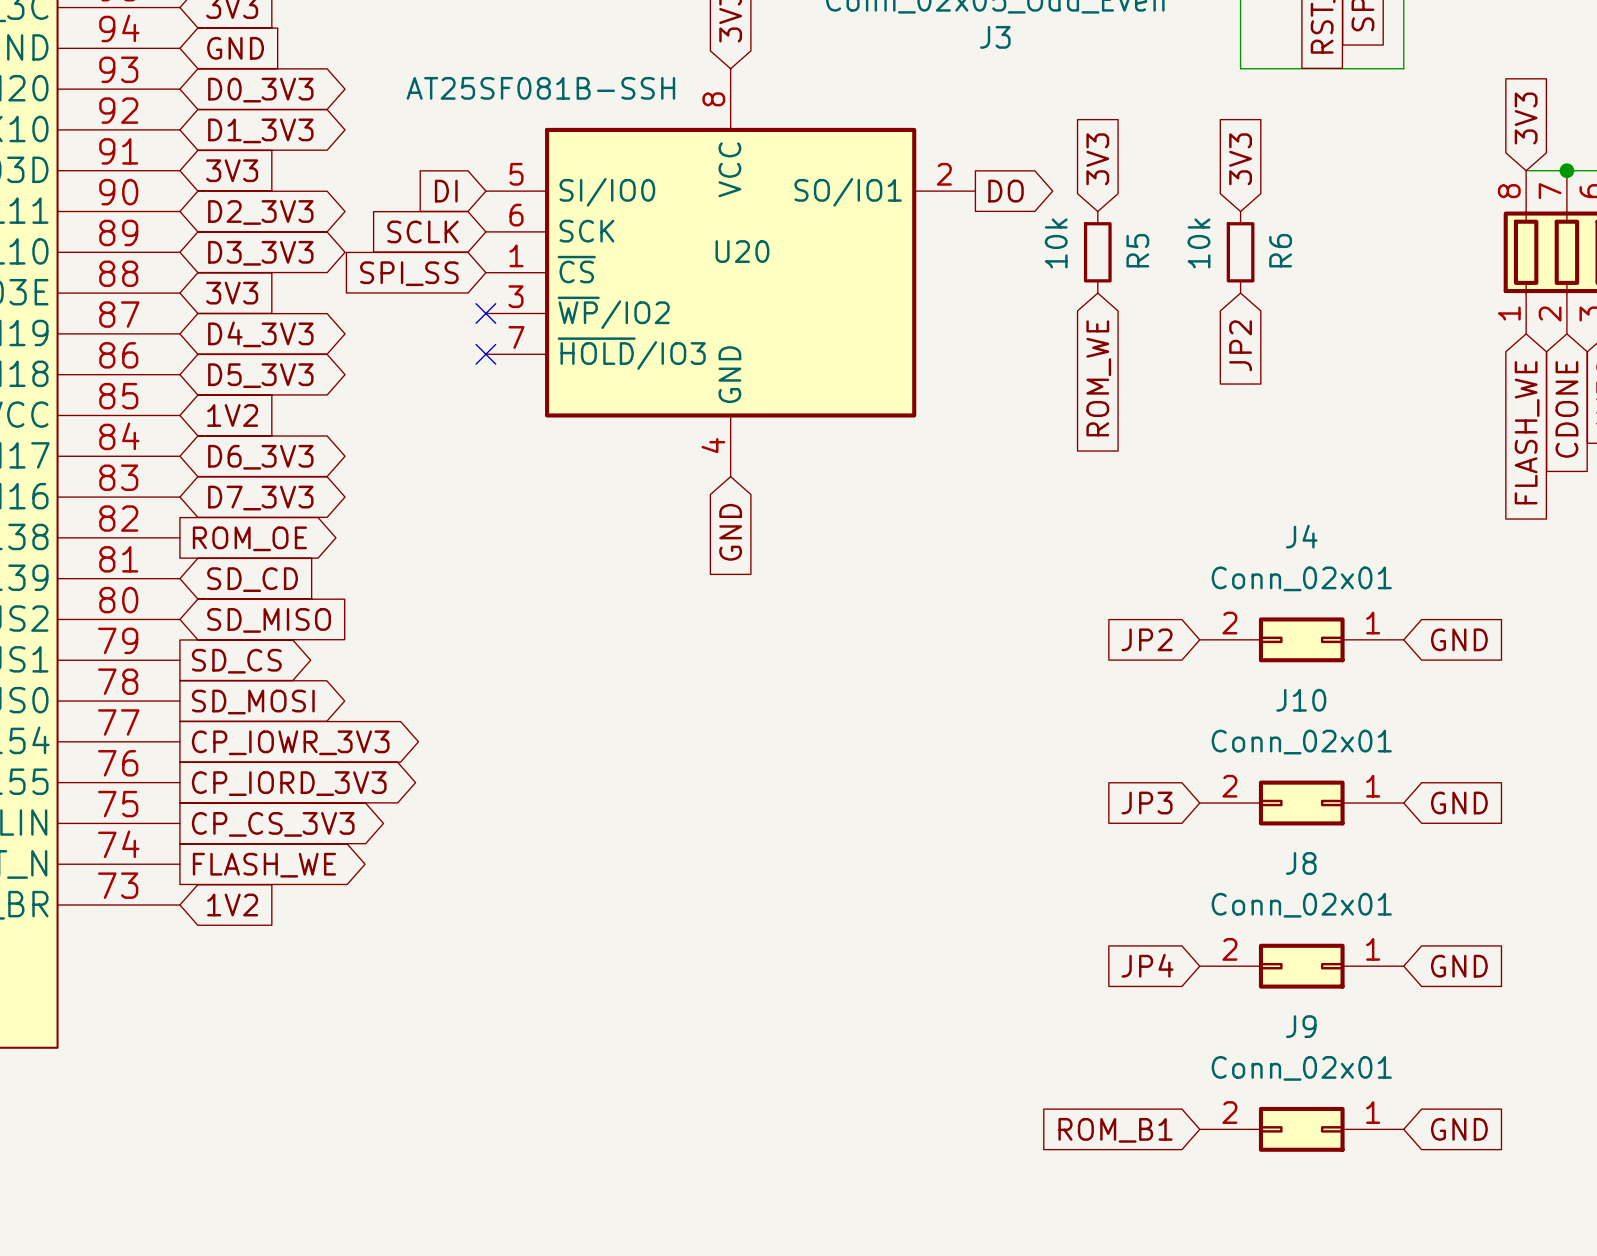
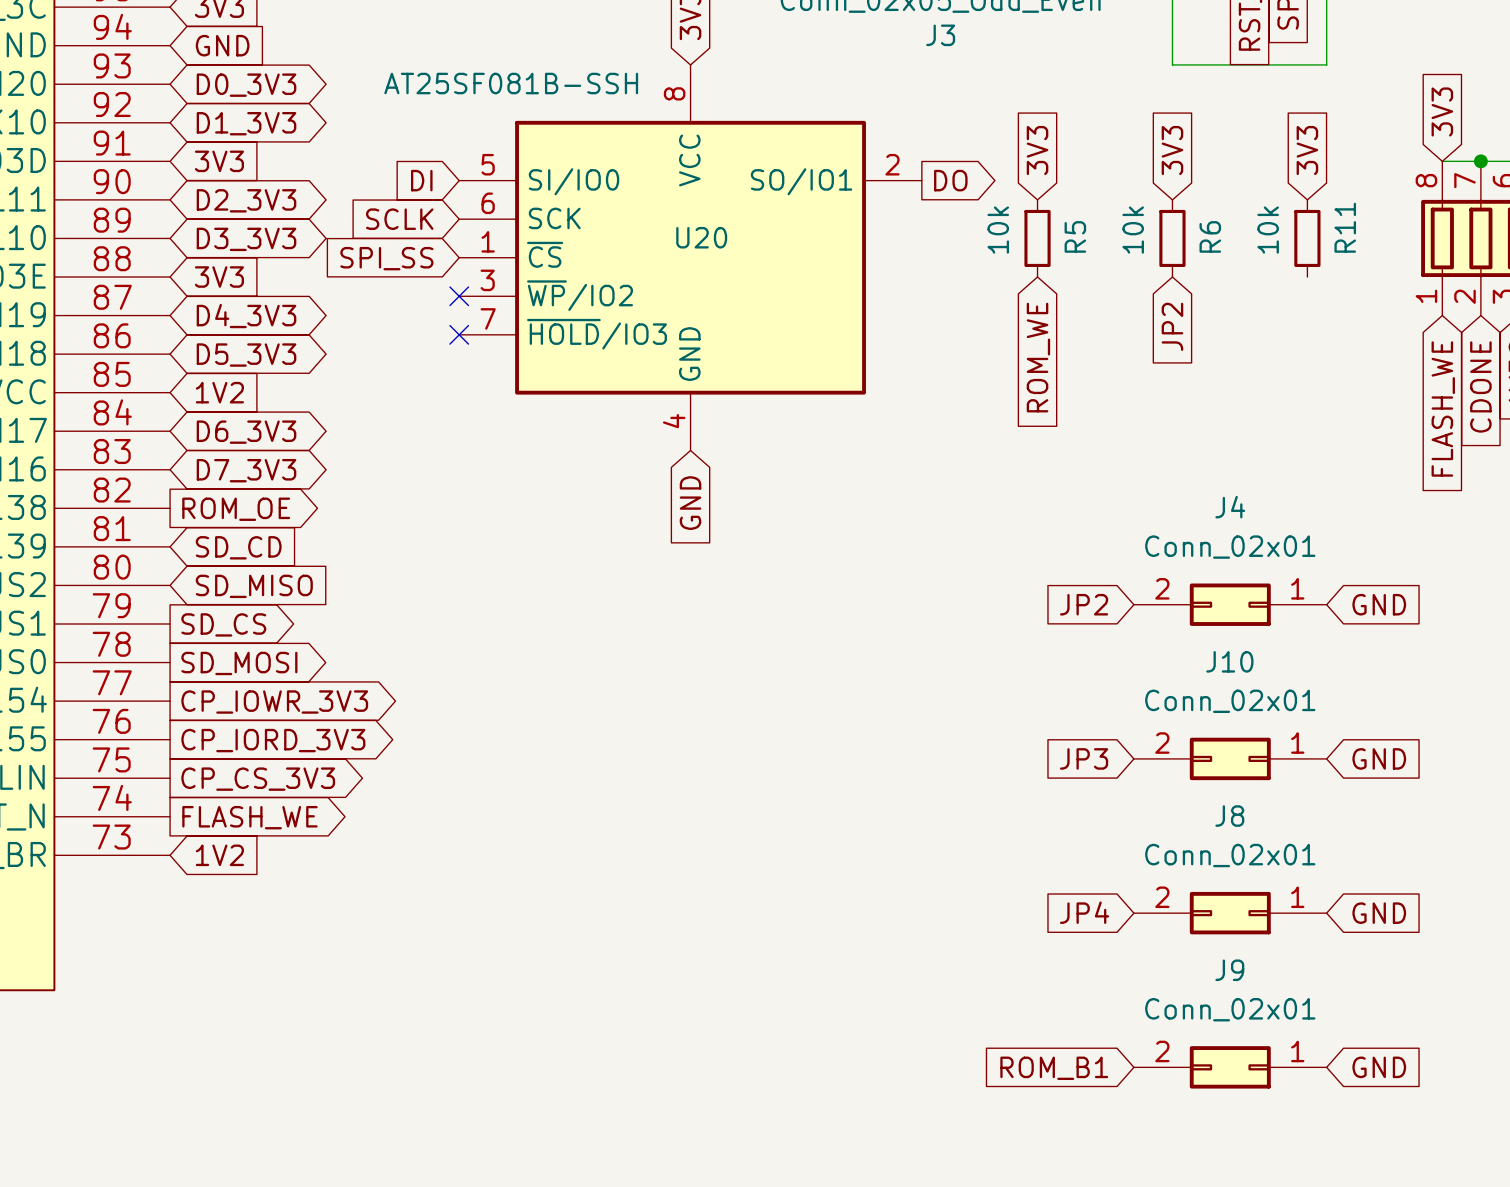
global label: none -> 3V3 (1307, 150)
R11: none -> 10k (1307, 238)

